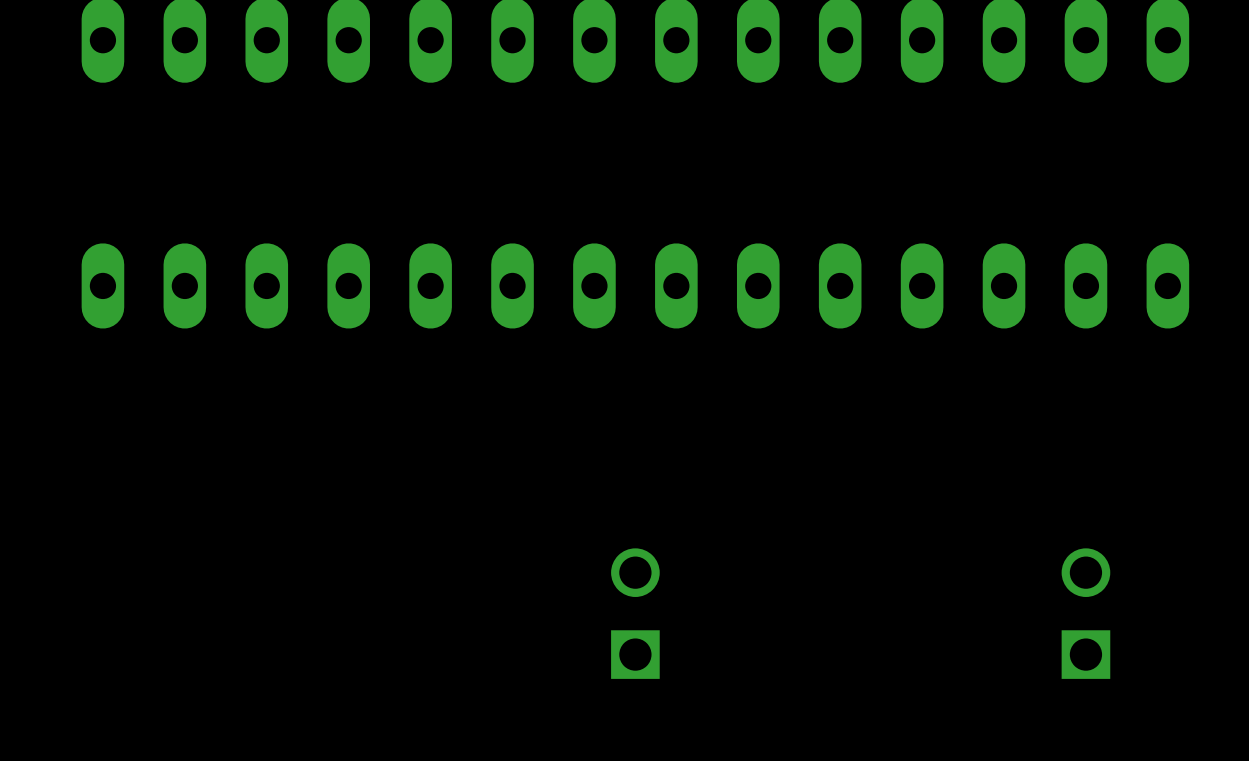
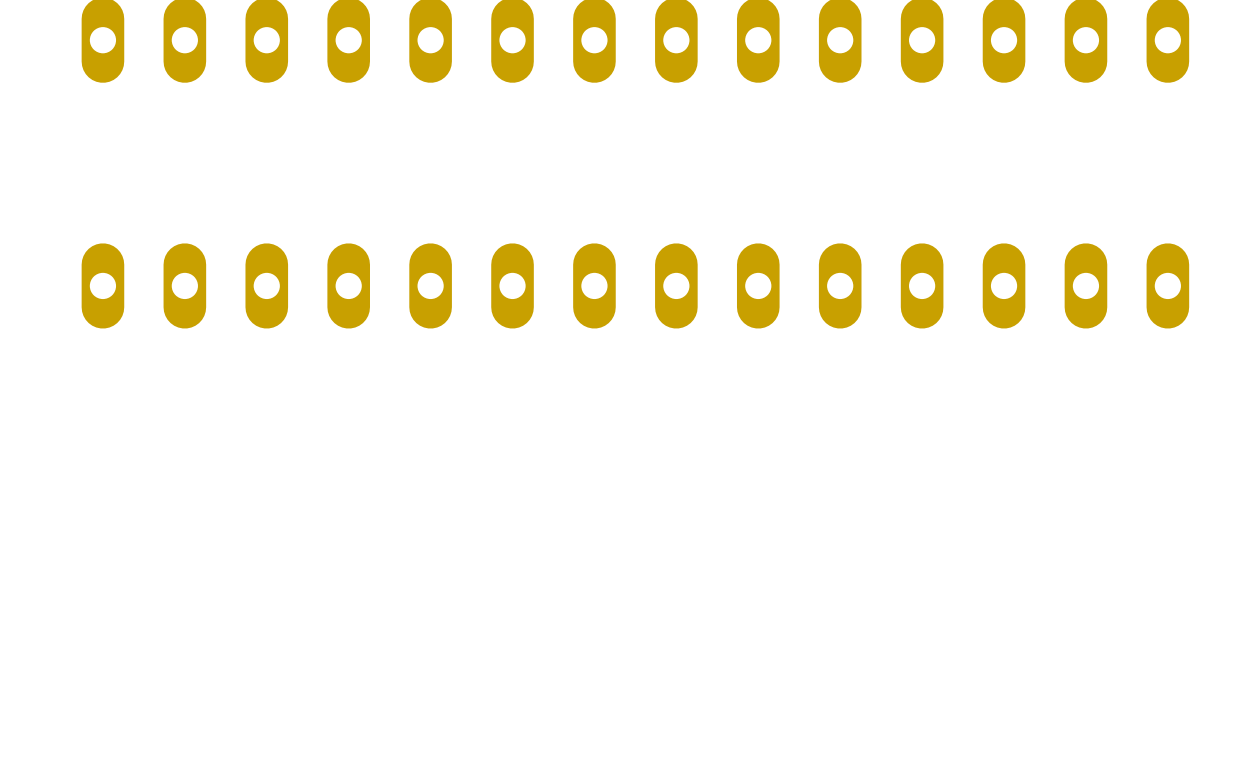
part: (635, 613) -> none
part: (1085, 613) -> none

